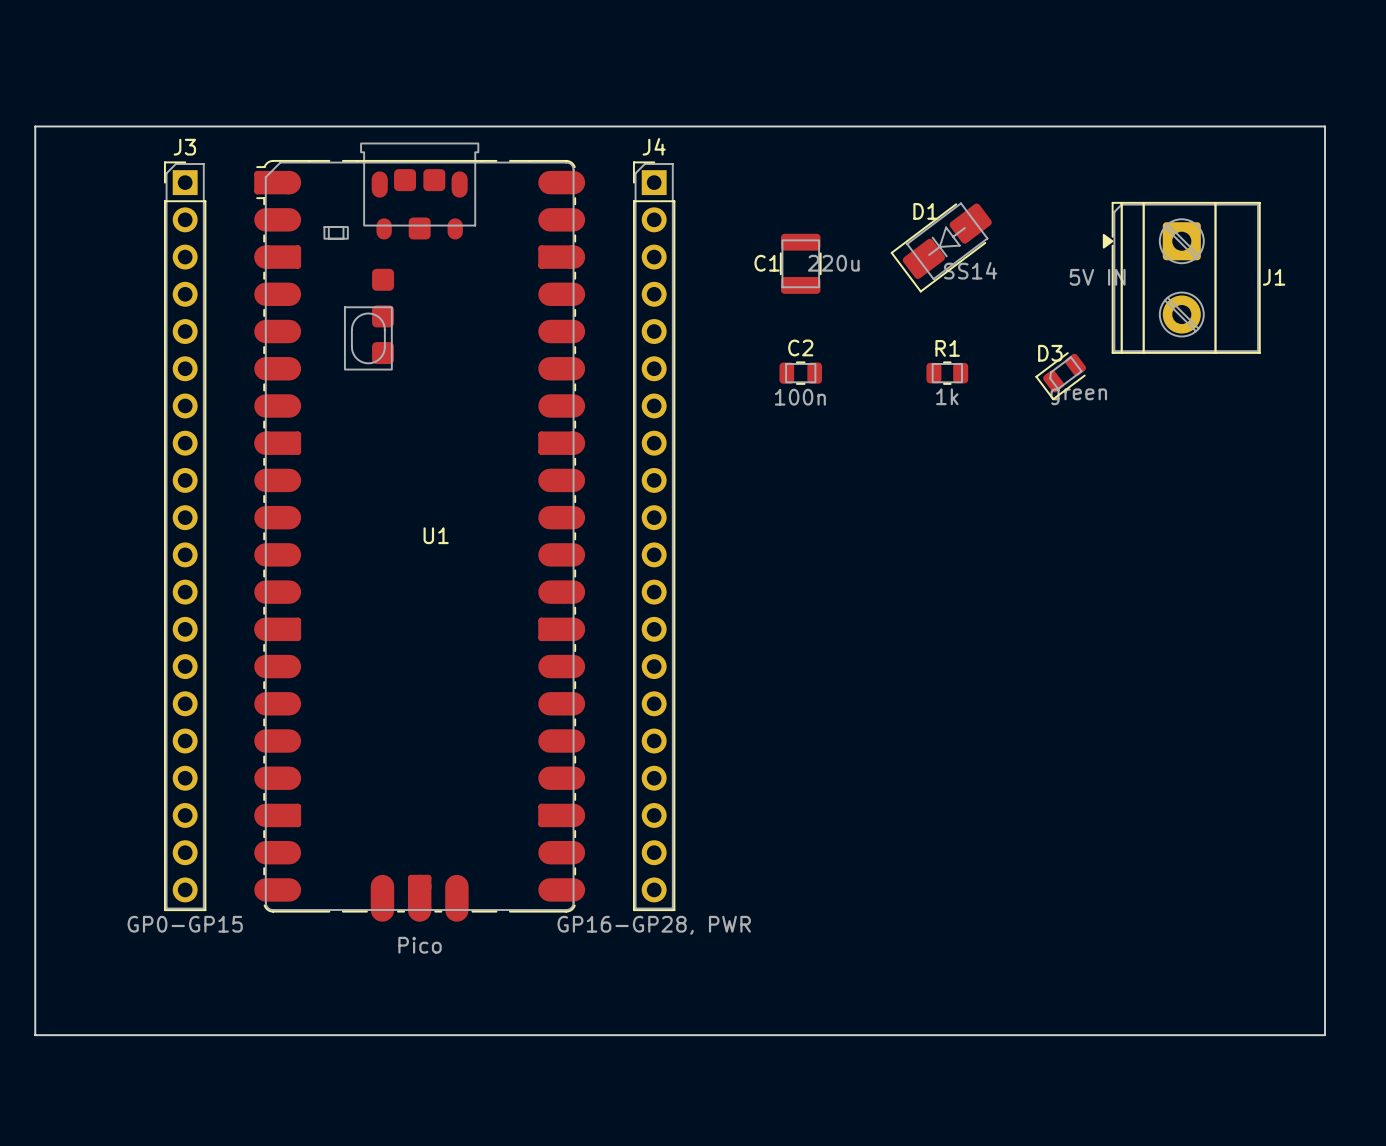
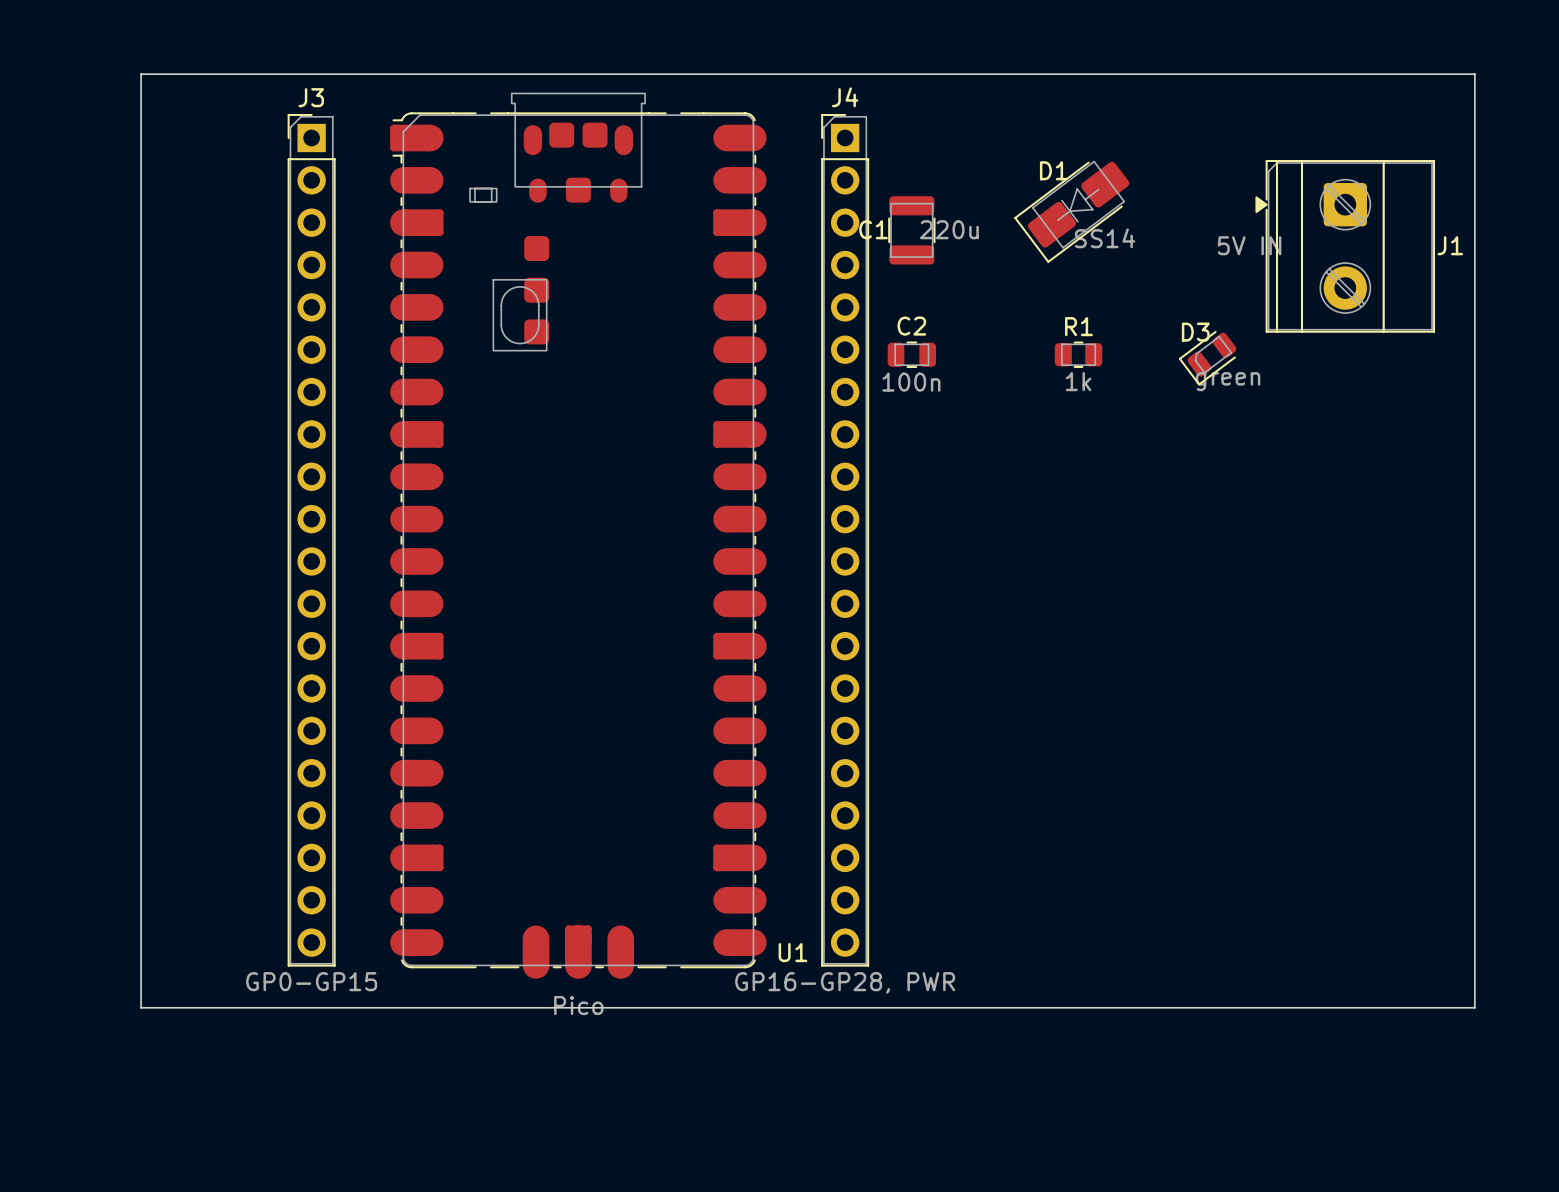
board edge: (123, 126) (35, 126) (35, 1035) (1324, 1035) (1324, 126) (1295, 126) -> (141, 74) (141, 1007) (1474, 1007) (1474, 74)
U1 position: (419, 532) -> (578, 535)
U1 name position: U1 (436, 535) -> U1 (792, 952)
J3 position: (185, 536) -> (311, 540)
J4 position: (654, 536) -> (845, 540)

